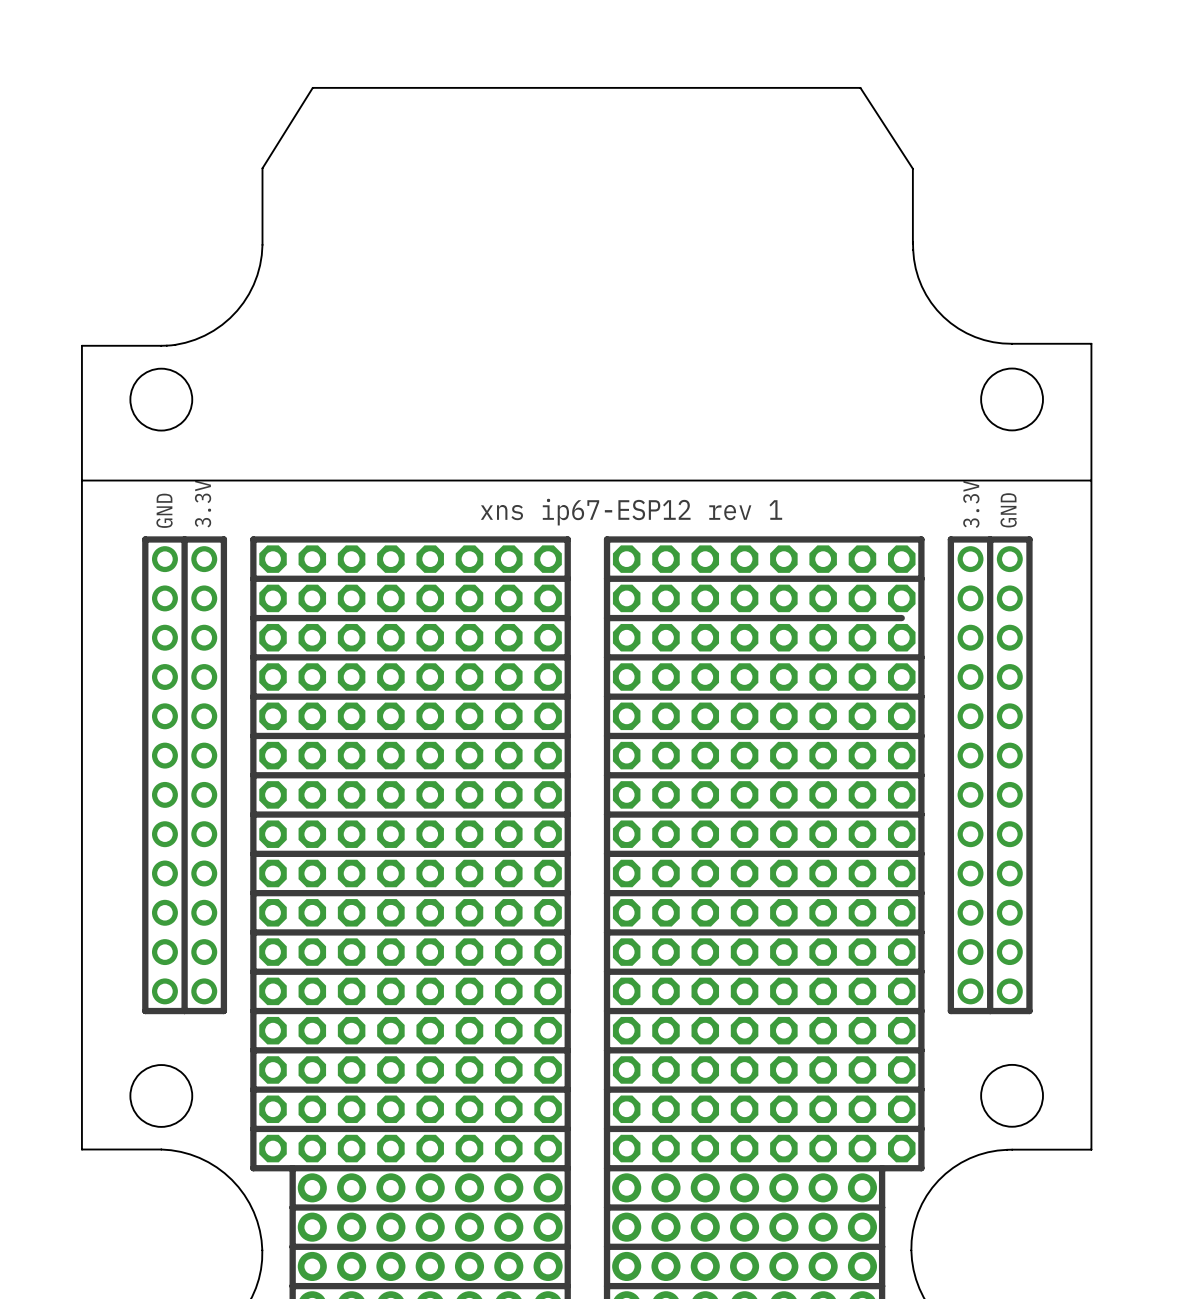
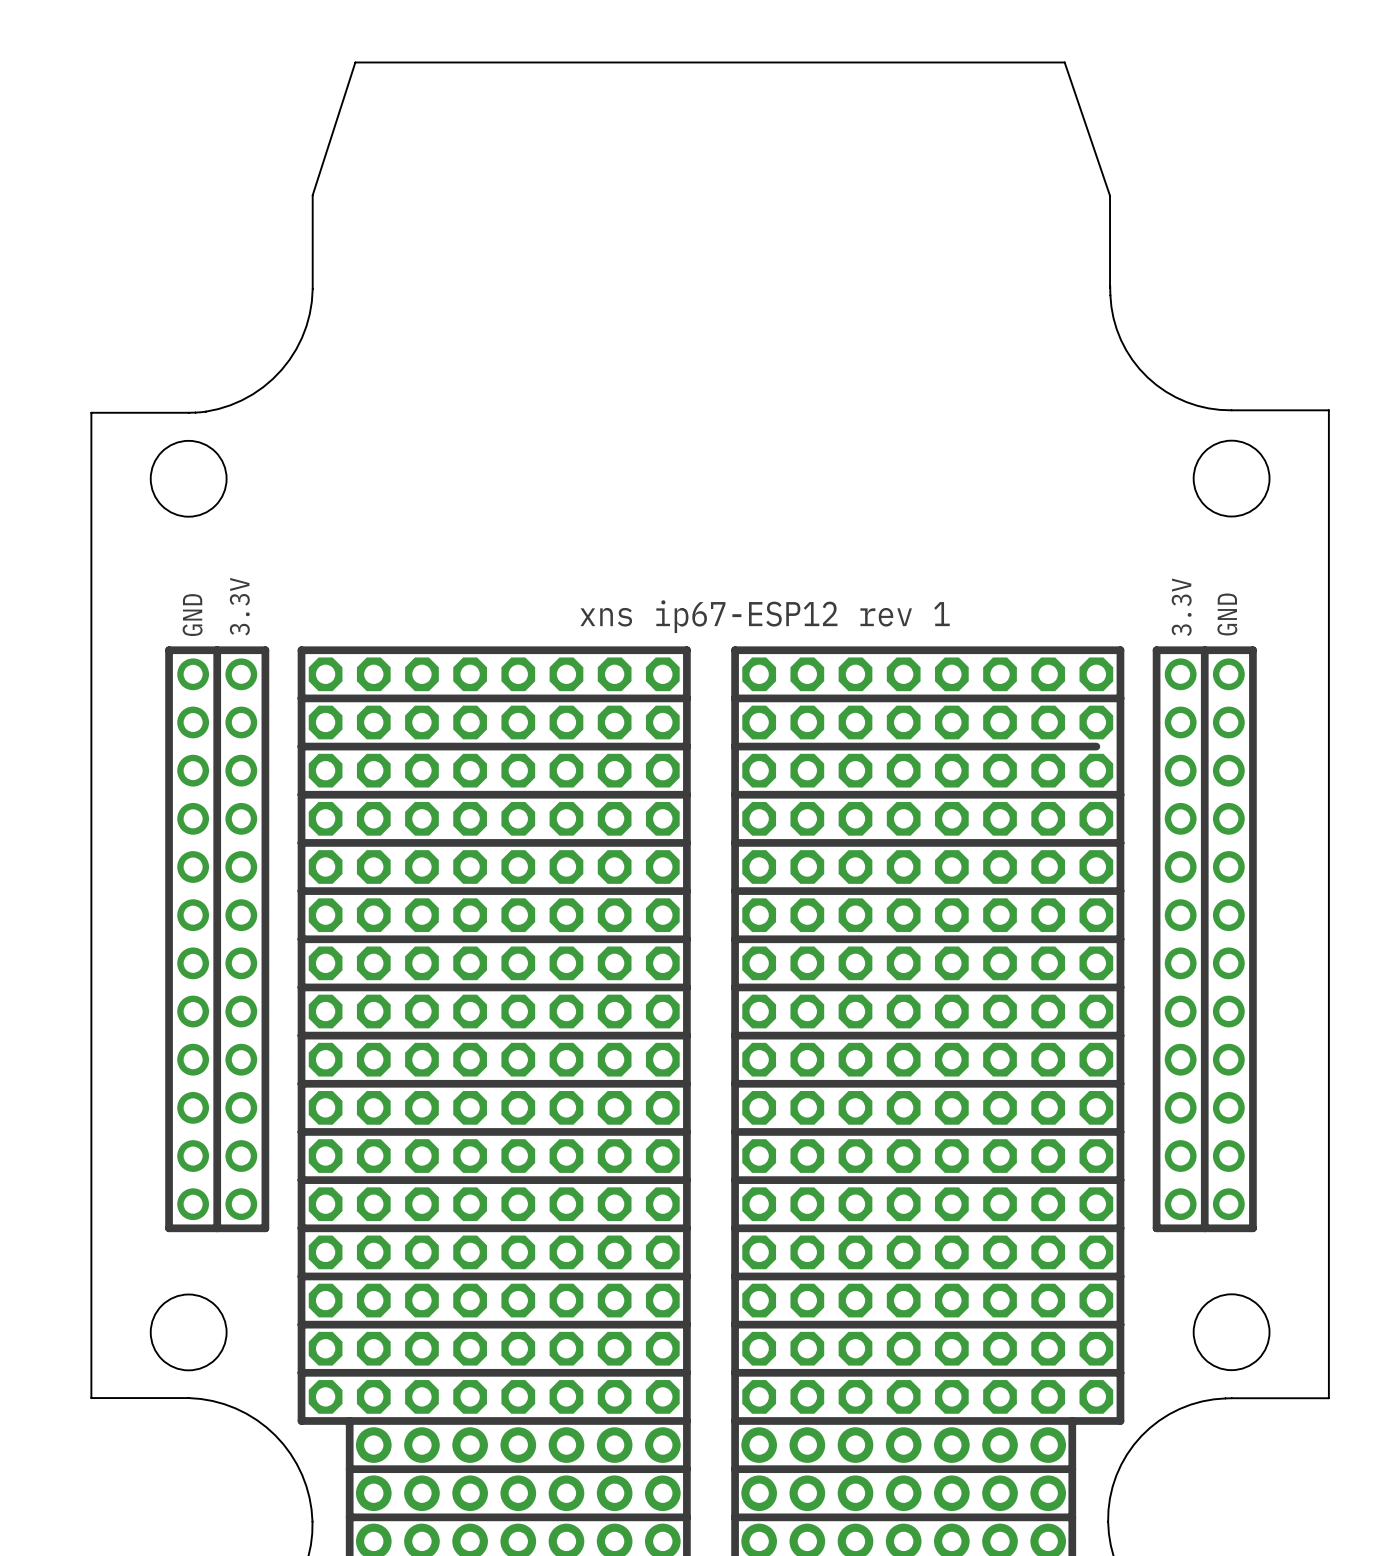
board edge: (262, 168) (312, 87) (860, 87) (912, 168) -> (312, 195) (355, 62) (1064, 62) (1110, 195)
board edge: (82, 480) (1090, 480) -> none

